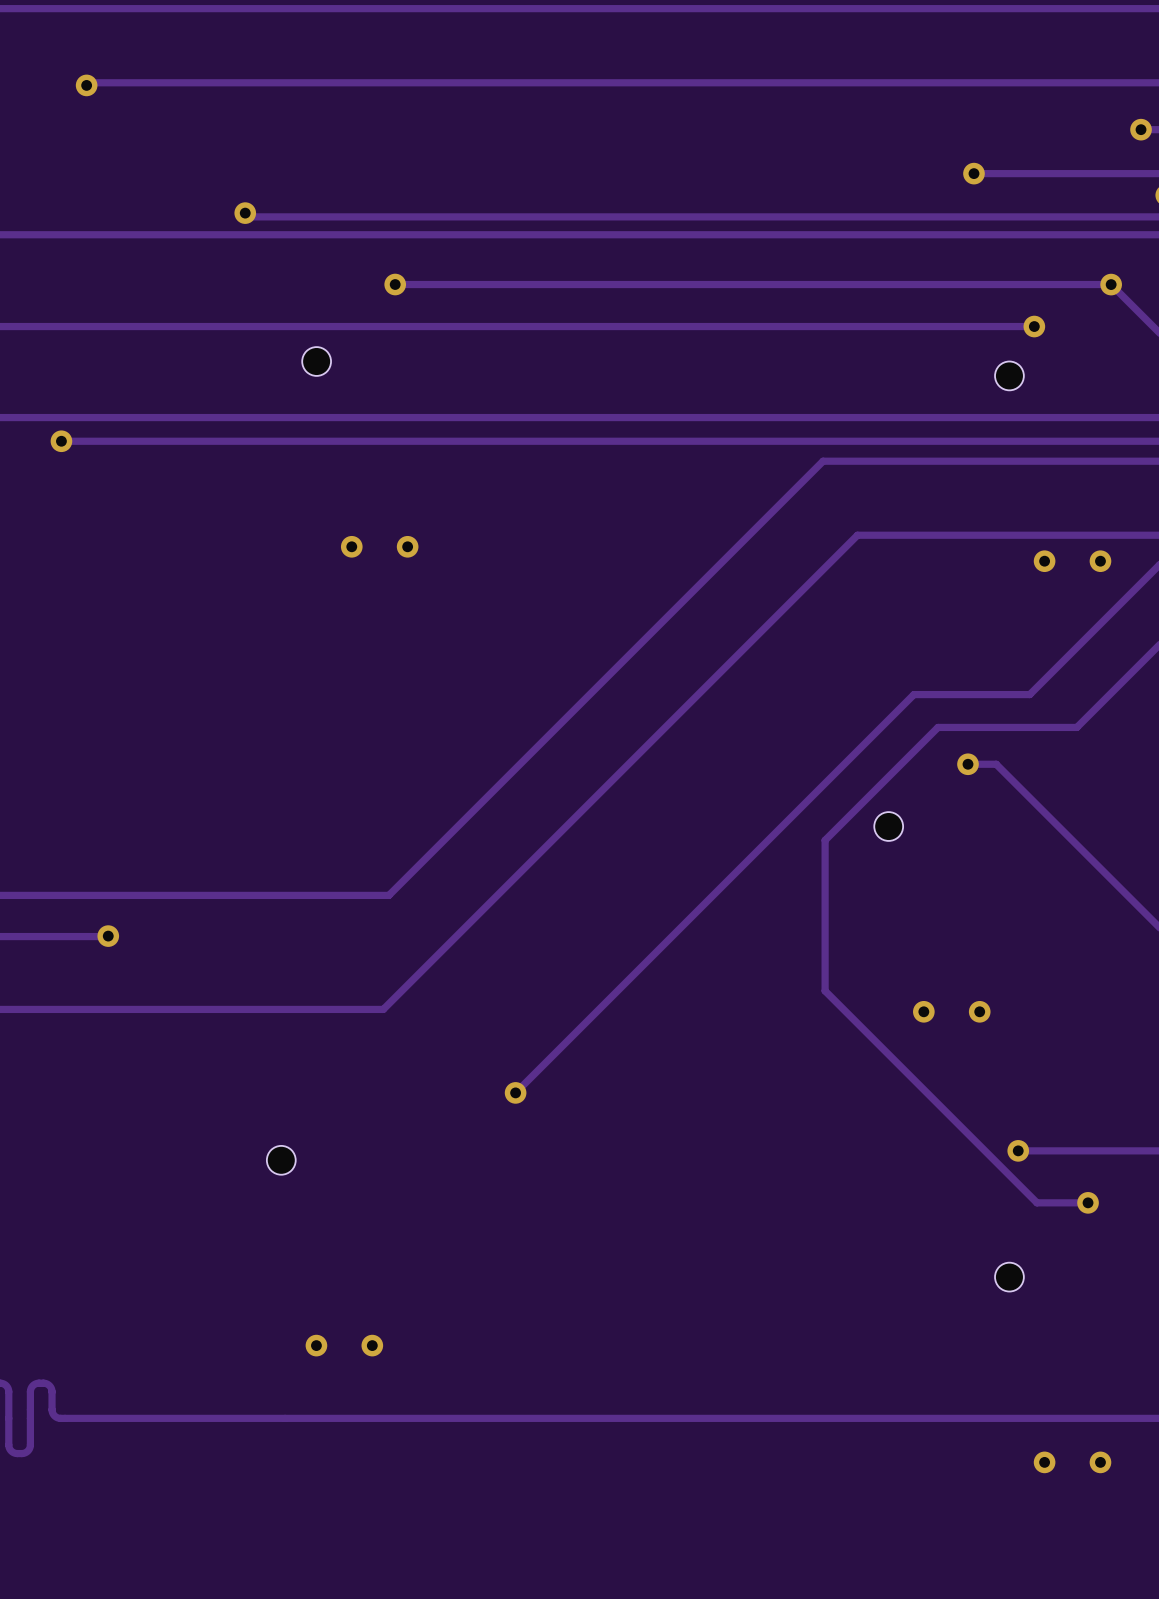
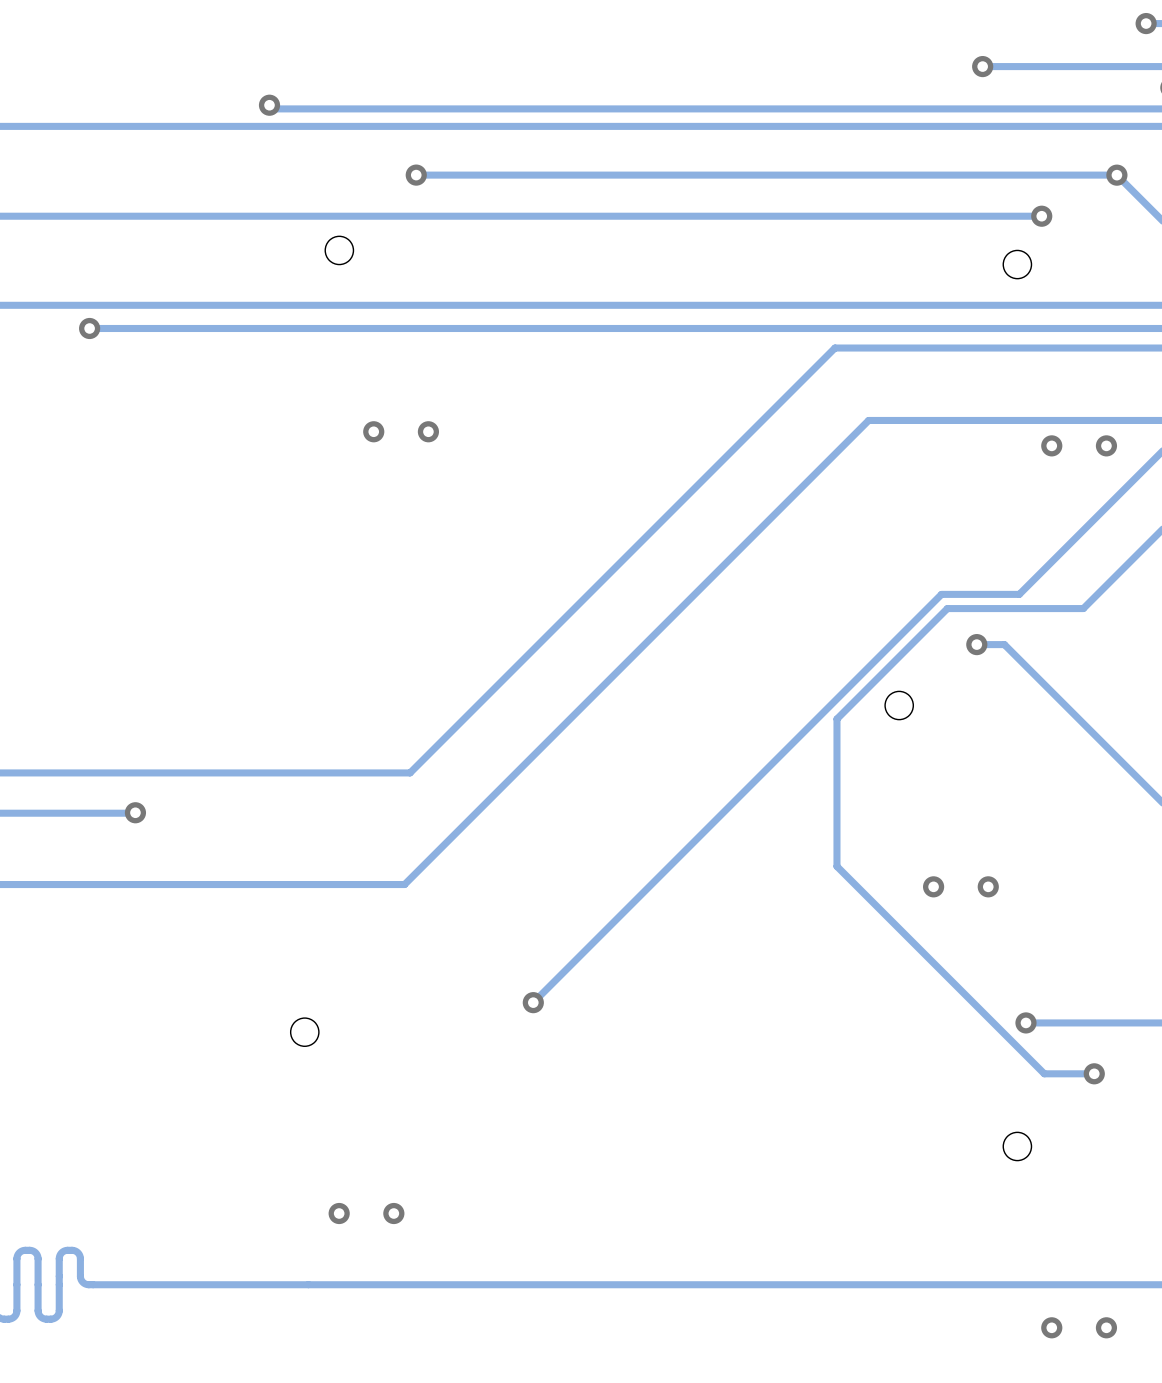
track: (1029, 694) (913, 694) (515, 1092) -> (1037, 576) (1019, 594) (941, 594) (533, 1002)
via position: (515, 1092) -> (533, 1002)

